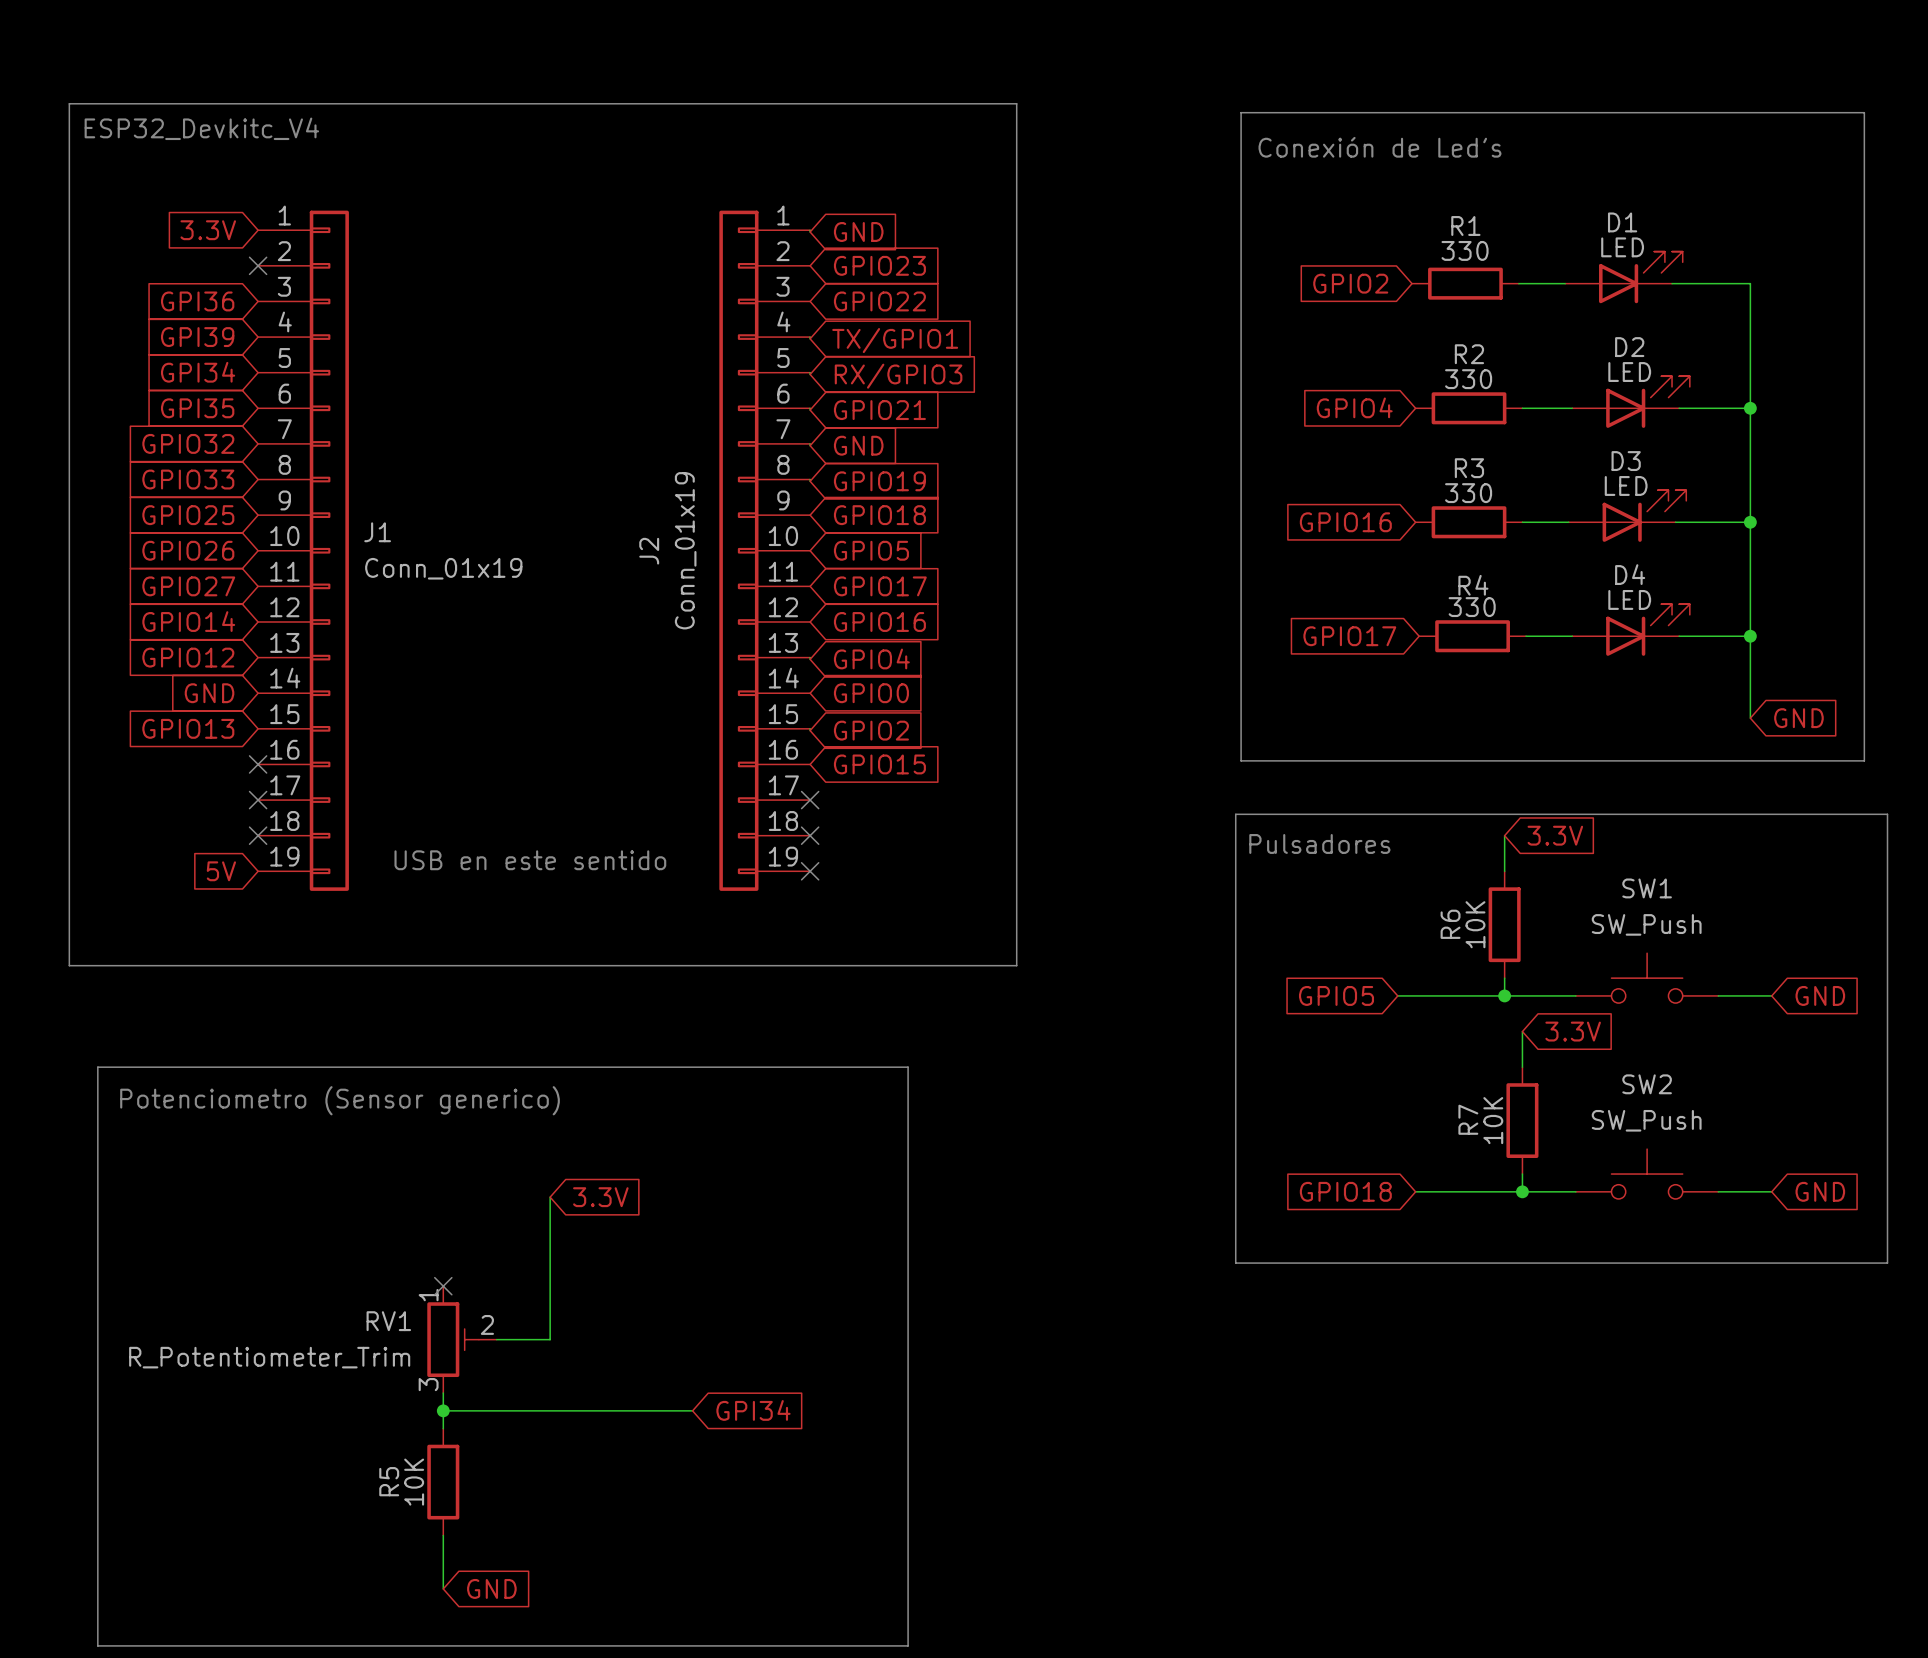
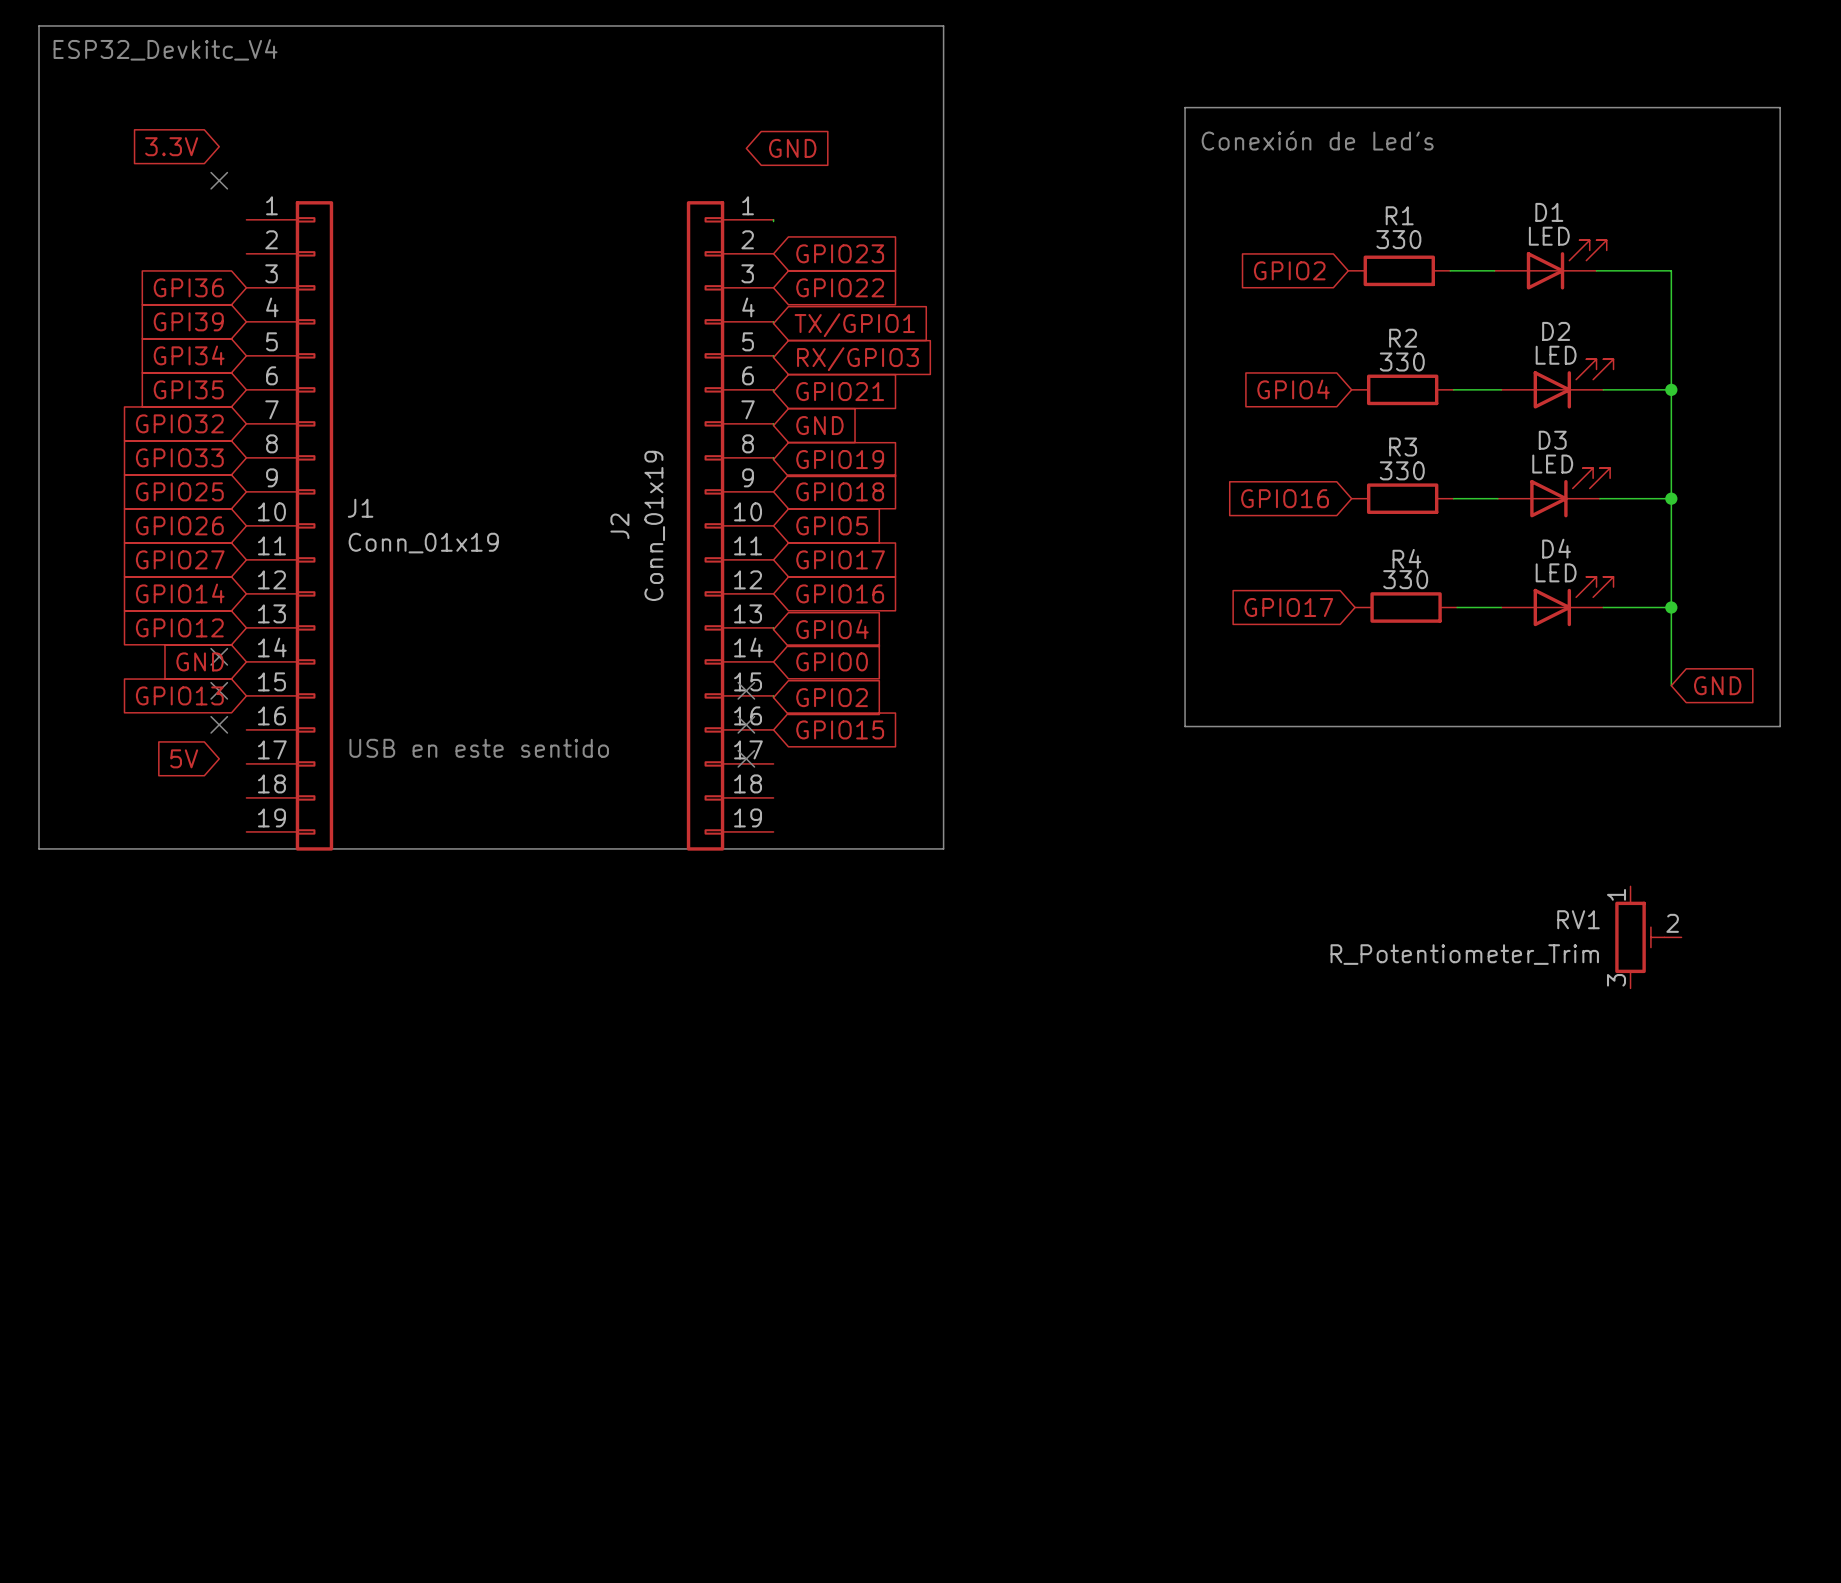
line: (69, 103) (1016, 103) (1016, 965) (69, 965) (69, 103) -> (39, 25) (943, 25) (943, 848) (39, 848) (39, 25)
text position: ESP32_Devkitc_V4 (201, 128) -> ESP32_Devkitc_V4 (165, 49)
global label position: 3.3V (208, 230) -> 3.3V (171, 146)
global label position: GND (858, 232) -> GND (792, 148)
no-connect mark position: (258, 265) -> (219, 180)
no-connect mark: none -> (219, 656)
no-connect mark: none -> (219, 690)
no-connect mark: none -> (746, 690)
no-connect mark: none -> (219, 724)
no-connect mark: none -> (746, 724)
no-connect mark: (258, 764) -> none
no-connect mark: none -> (746, 758)
no-connect mark: (258, 800) -> none
no-connect mark: (810, 800) -> none
line: (1235, 814) (1887, 814) (1887, 1263) (1235, 1263) (1235, 814) -> none
no-connect mark: (258, 835) -> none
no-connect mark: (810, 835) -> none
wire: (1504, 835) (1504, 871) -> none
global label: 3.3V (1555, 835) -> none
text: Pulsadores (1319, 843) -> none
text position: USB en este sentido (530, 860) -> USB en este sentido (479, 748)
global label position: 5V (221, 871) -> 5V (184, 758)
no-connect mark: (810, 871) -> none
R6: 10K (1504, 924) -> none
wire: (1504, 978) (1504, 995) -> none
SW1: SW_Push (1647, 978) -> none
global label: GPIO5 (1336, 995) -> none
wire: (1397, 995) (1575, 995) -> none
junction: (1504, 995) -> none
wire: (1718, 995) (1771, 995) -> none
global label: GND (1820, 995) -> none
wire: (1522, 1031) (1522, 1067) -> none
global label: 3.3V (1573, 1031) -> none
line: (97, 1067) (908, 1067) (908, 1645) (97, 1645) (97, 1067) -> none
text: Potenciometro (Sensor generico) (340, 1100) -> none
R7: 10K (1522, 1120) -> none
wire: (1522, 1174) (1522, 1191) -> none
SW2: SW_Push (1647, 1174) -> none
global label: GPIO18 (1345, 1191) -> none
wire: (1415, 1191) (1575, 1191) -> none
junction: (1522, 1191) -> none
wire: (1718, 1191) (1771, 1191) -> none
global label: GND (1820, 1191) -> none
wire: (550, 1197) (550, 1339) (496, 1339) -> none
global label: 3.3V (600, 1197) -> none
no-connect mark: (443, 1286) -> none
RV1 position: (462, 1339) -> (1648, 937)
wire: (443, 1393) (443, 1428) -> none
wire: (443, 1410) (692, 1410) -> none
junction: (443, 1410) -> none
global label: GPI34 (753, 1410) -> none
R5: 10K (443, 1482) -> none
wire: (443, 1535) (443, 1588) -> none
global label: GND (491, 1588) -> none

